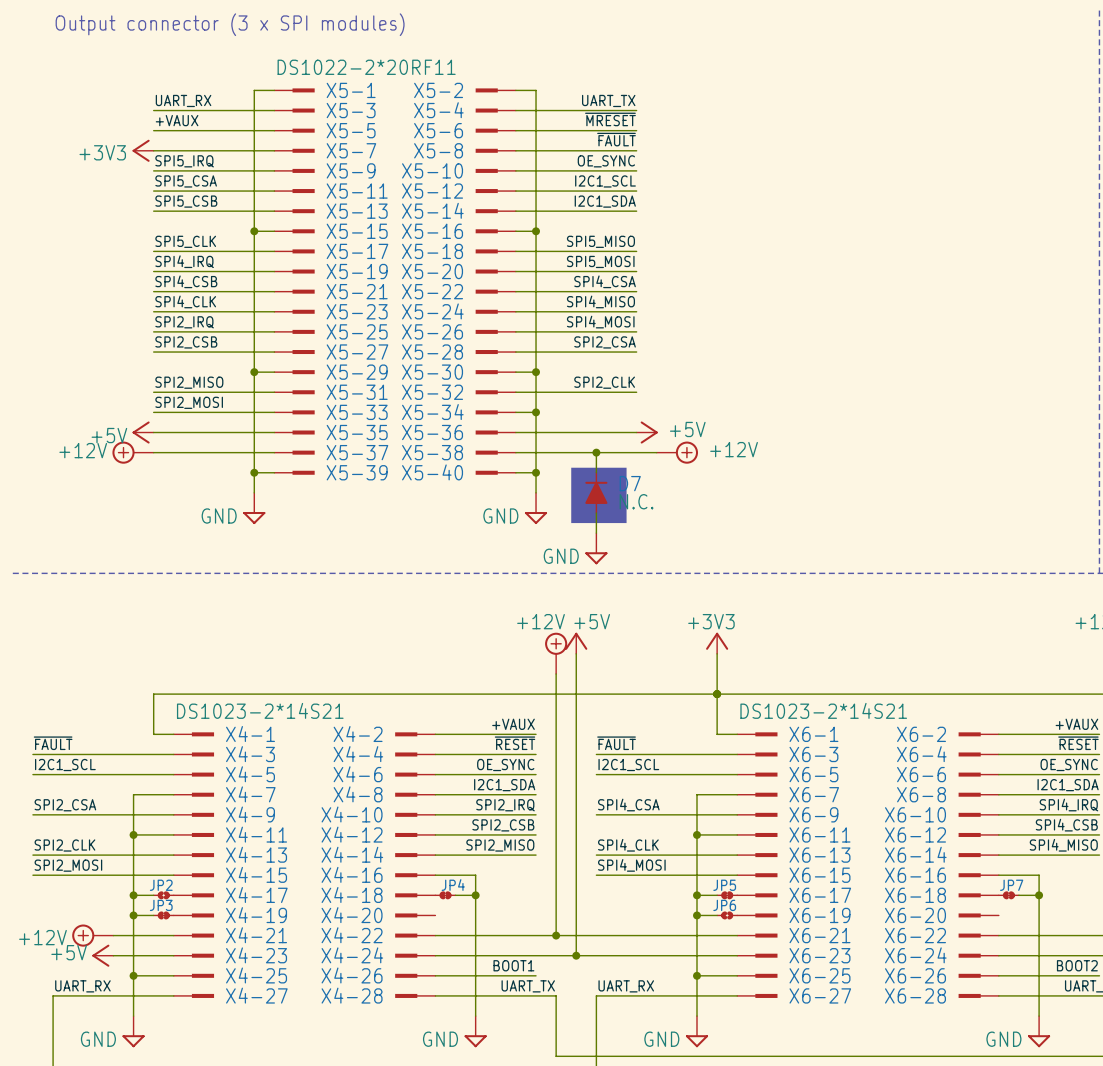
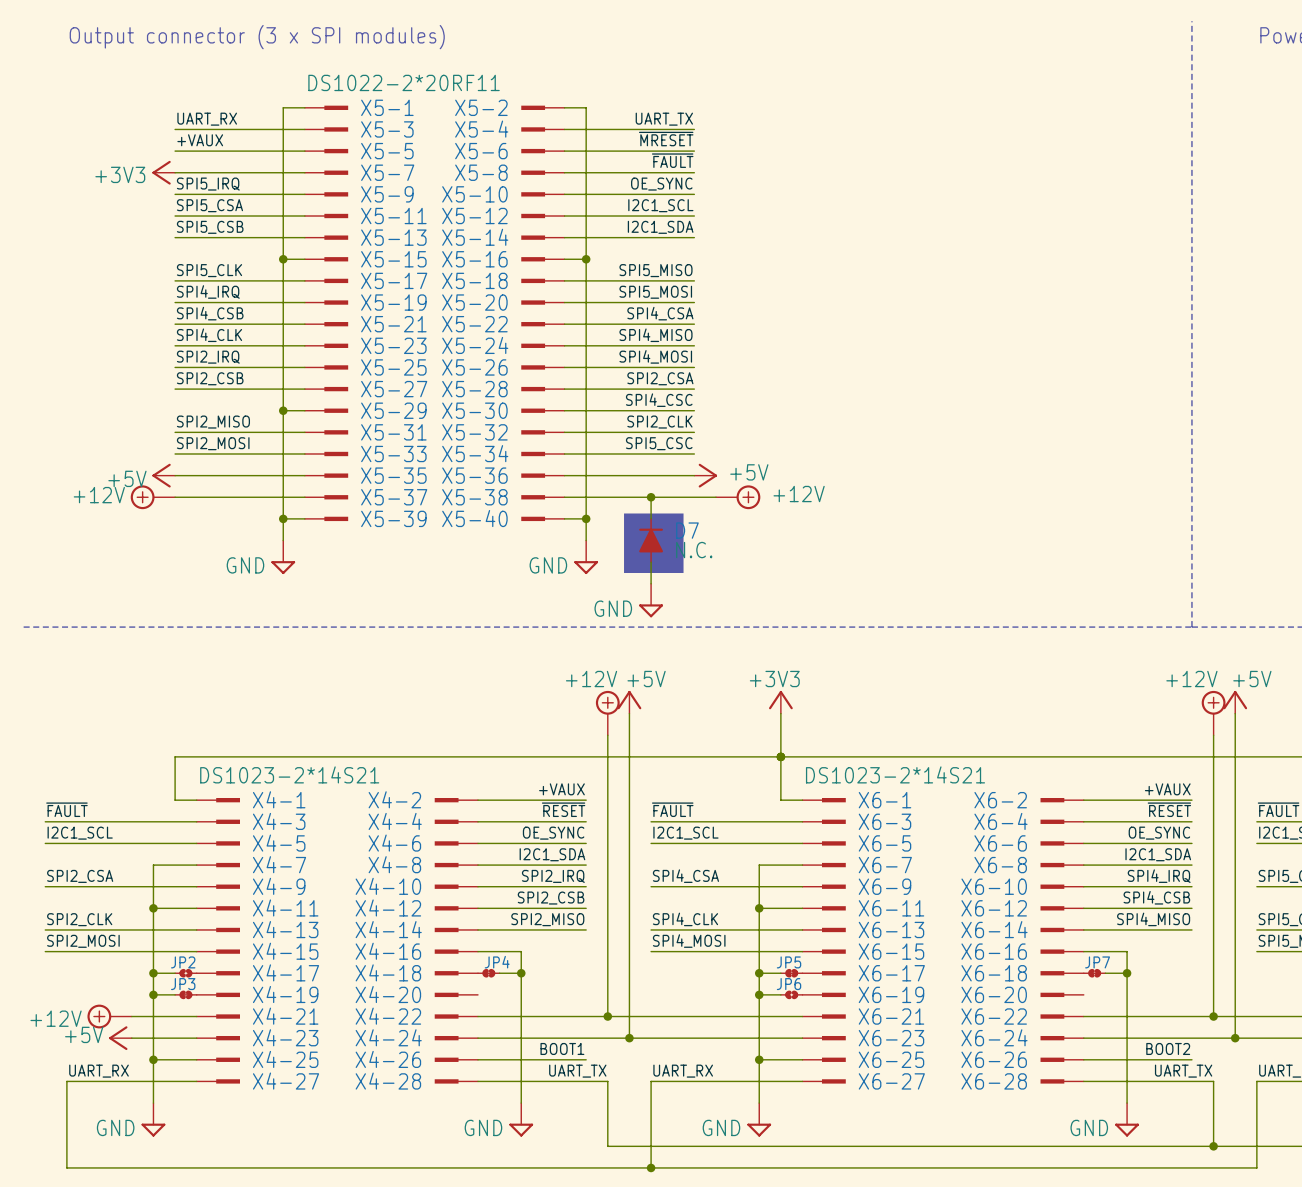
label: none -> SPI4_CSC (659, 400)
wire: none -> (586, 410) (694, 410)
junction: (536, 372) -> none
label: none -> SPI5_CSC (659, 443)
wire: none -> (586, 453) (694, 453)
junction: (536, 412) -> none

